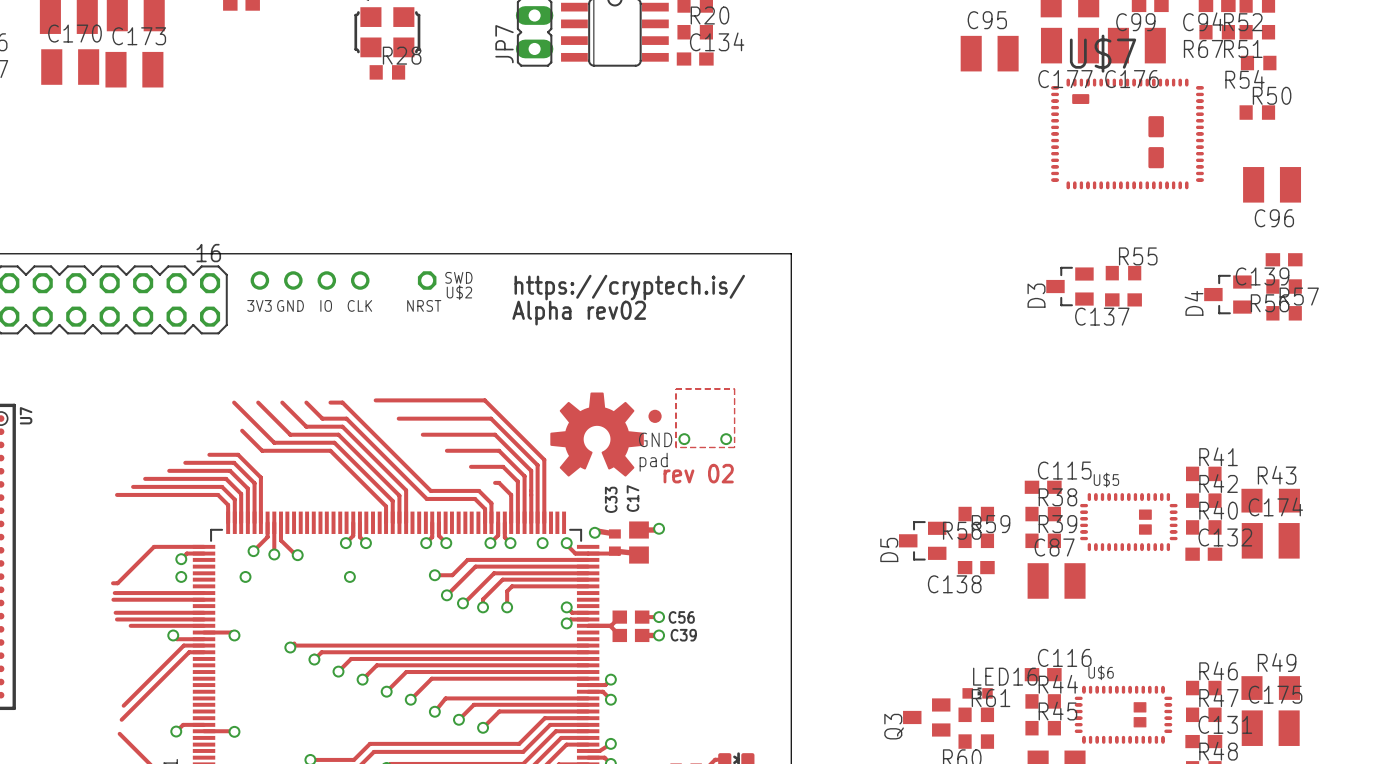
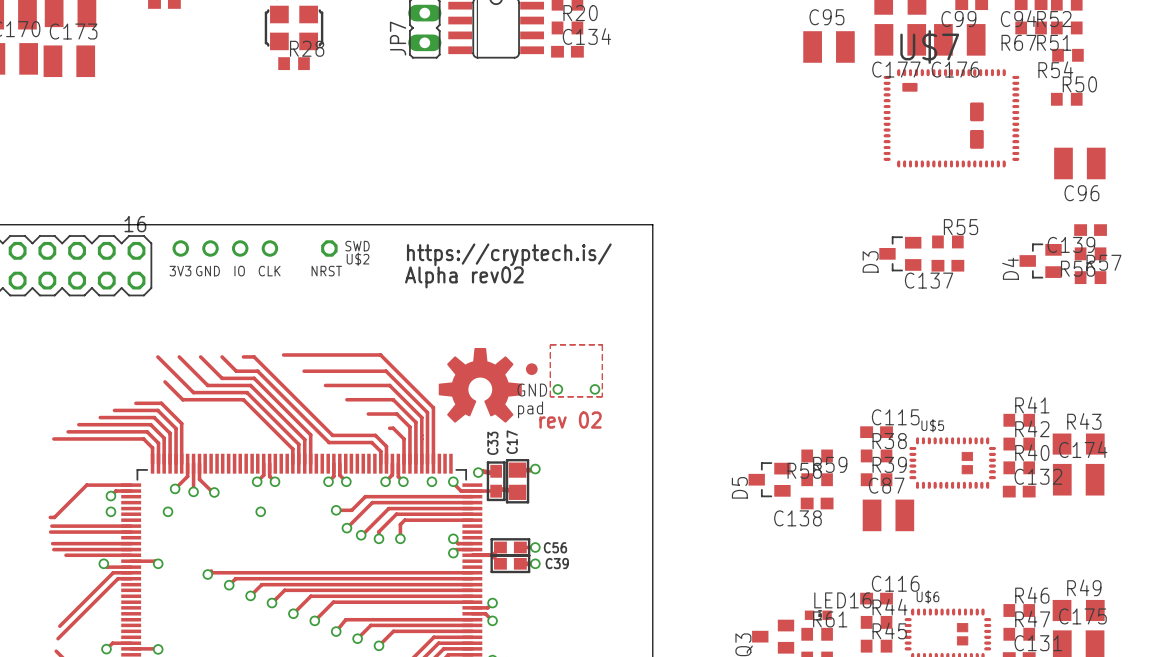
C17 footprint: [629, 521, 649, 564] -> [505, 458, 530, 504]
C33 footprint: [608, 529, 621, 556] -> [486, 461, 506, 502]
C56 footprint: [612, 610, 650, 624] -> [490, 538, 531, 557]
C39 footprint: [612, 628, 650, 643] -> [490, 554, 531, 574]

